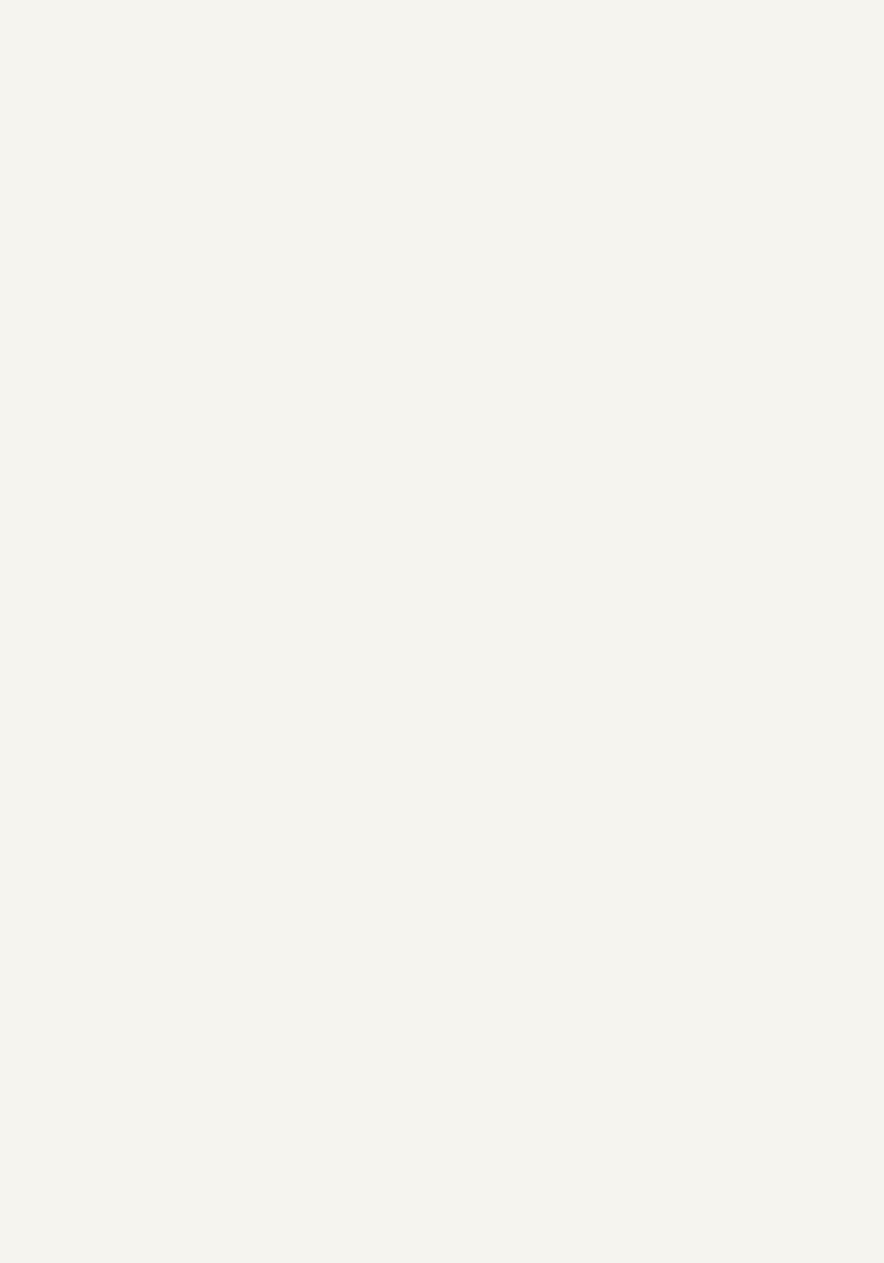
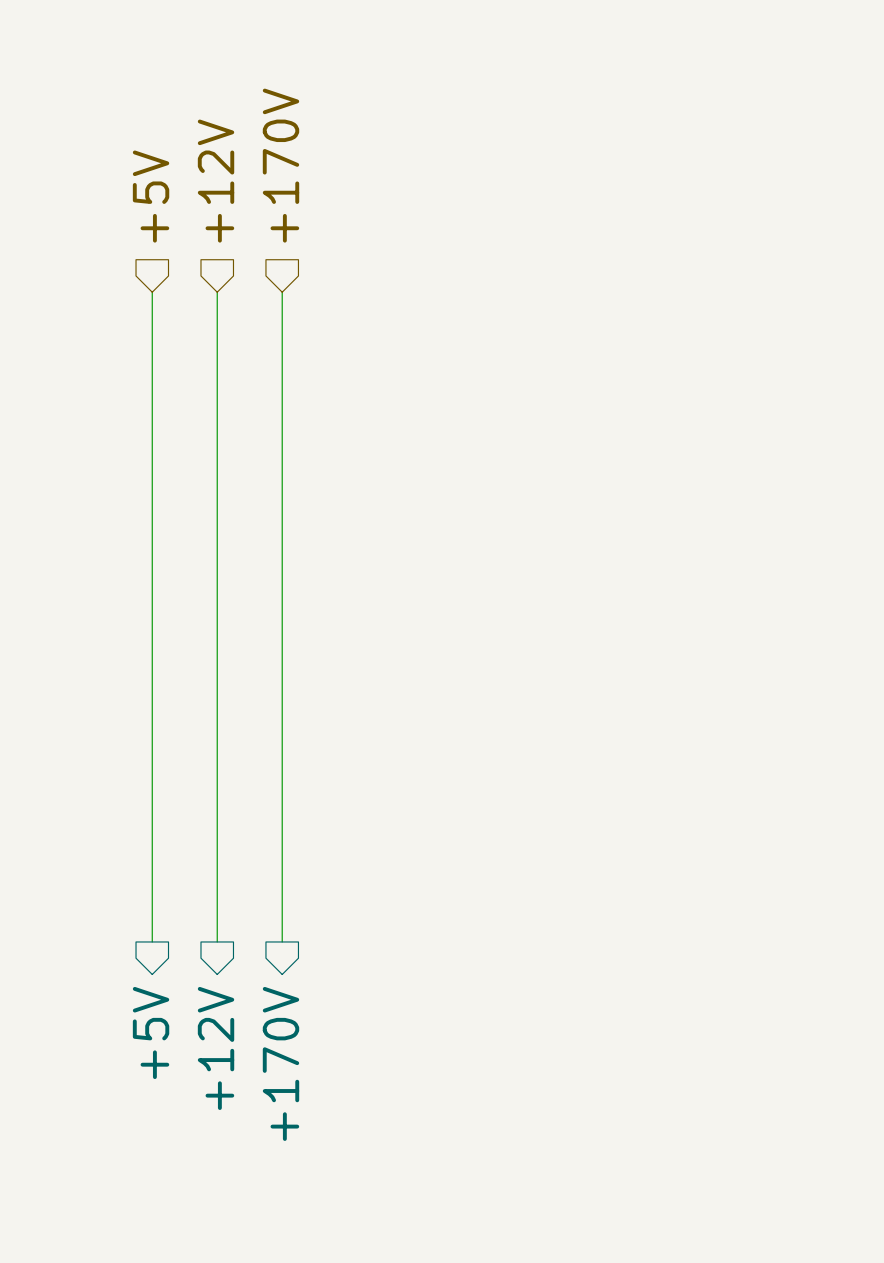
hierarchical label: none -> +170V (280, 165)
hierarchical label: none -> +12V (216, 181)
hierarchical label: none -> +5V (151, 196)
wire: none -> (152, 292) (152, 941)
wire: none -> (217, 292) (217, 941)
wire: none -> (282, 292) (282, 941)
sheet pin: none -> +5V (151, 1032)
sheet pin: none -> +12V (216, 1048)
sheet pin: none -> +170V (280, 1063)

